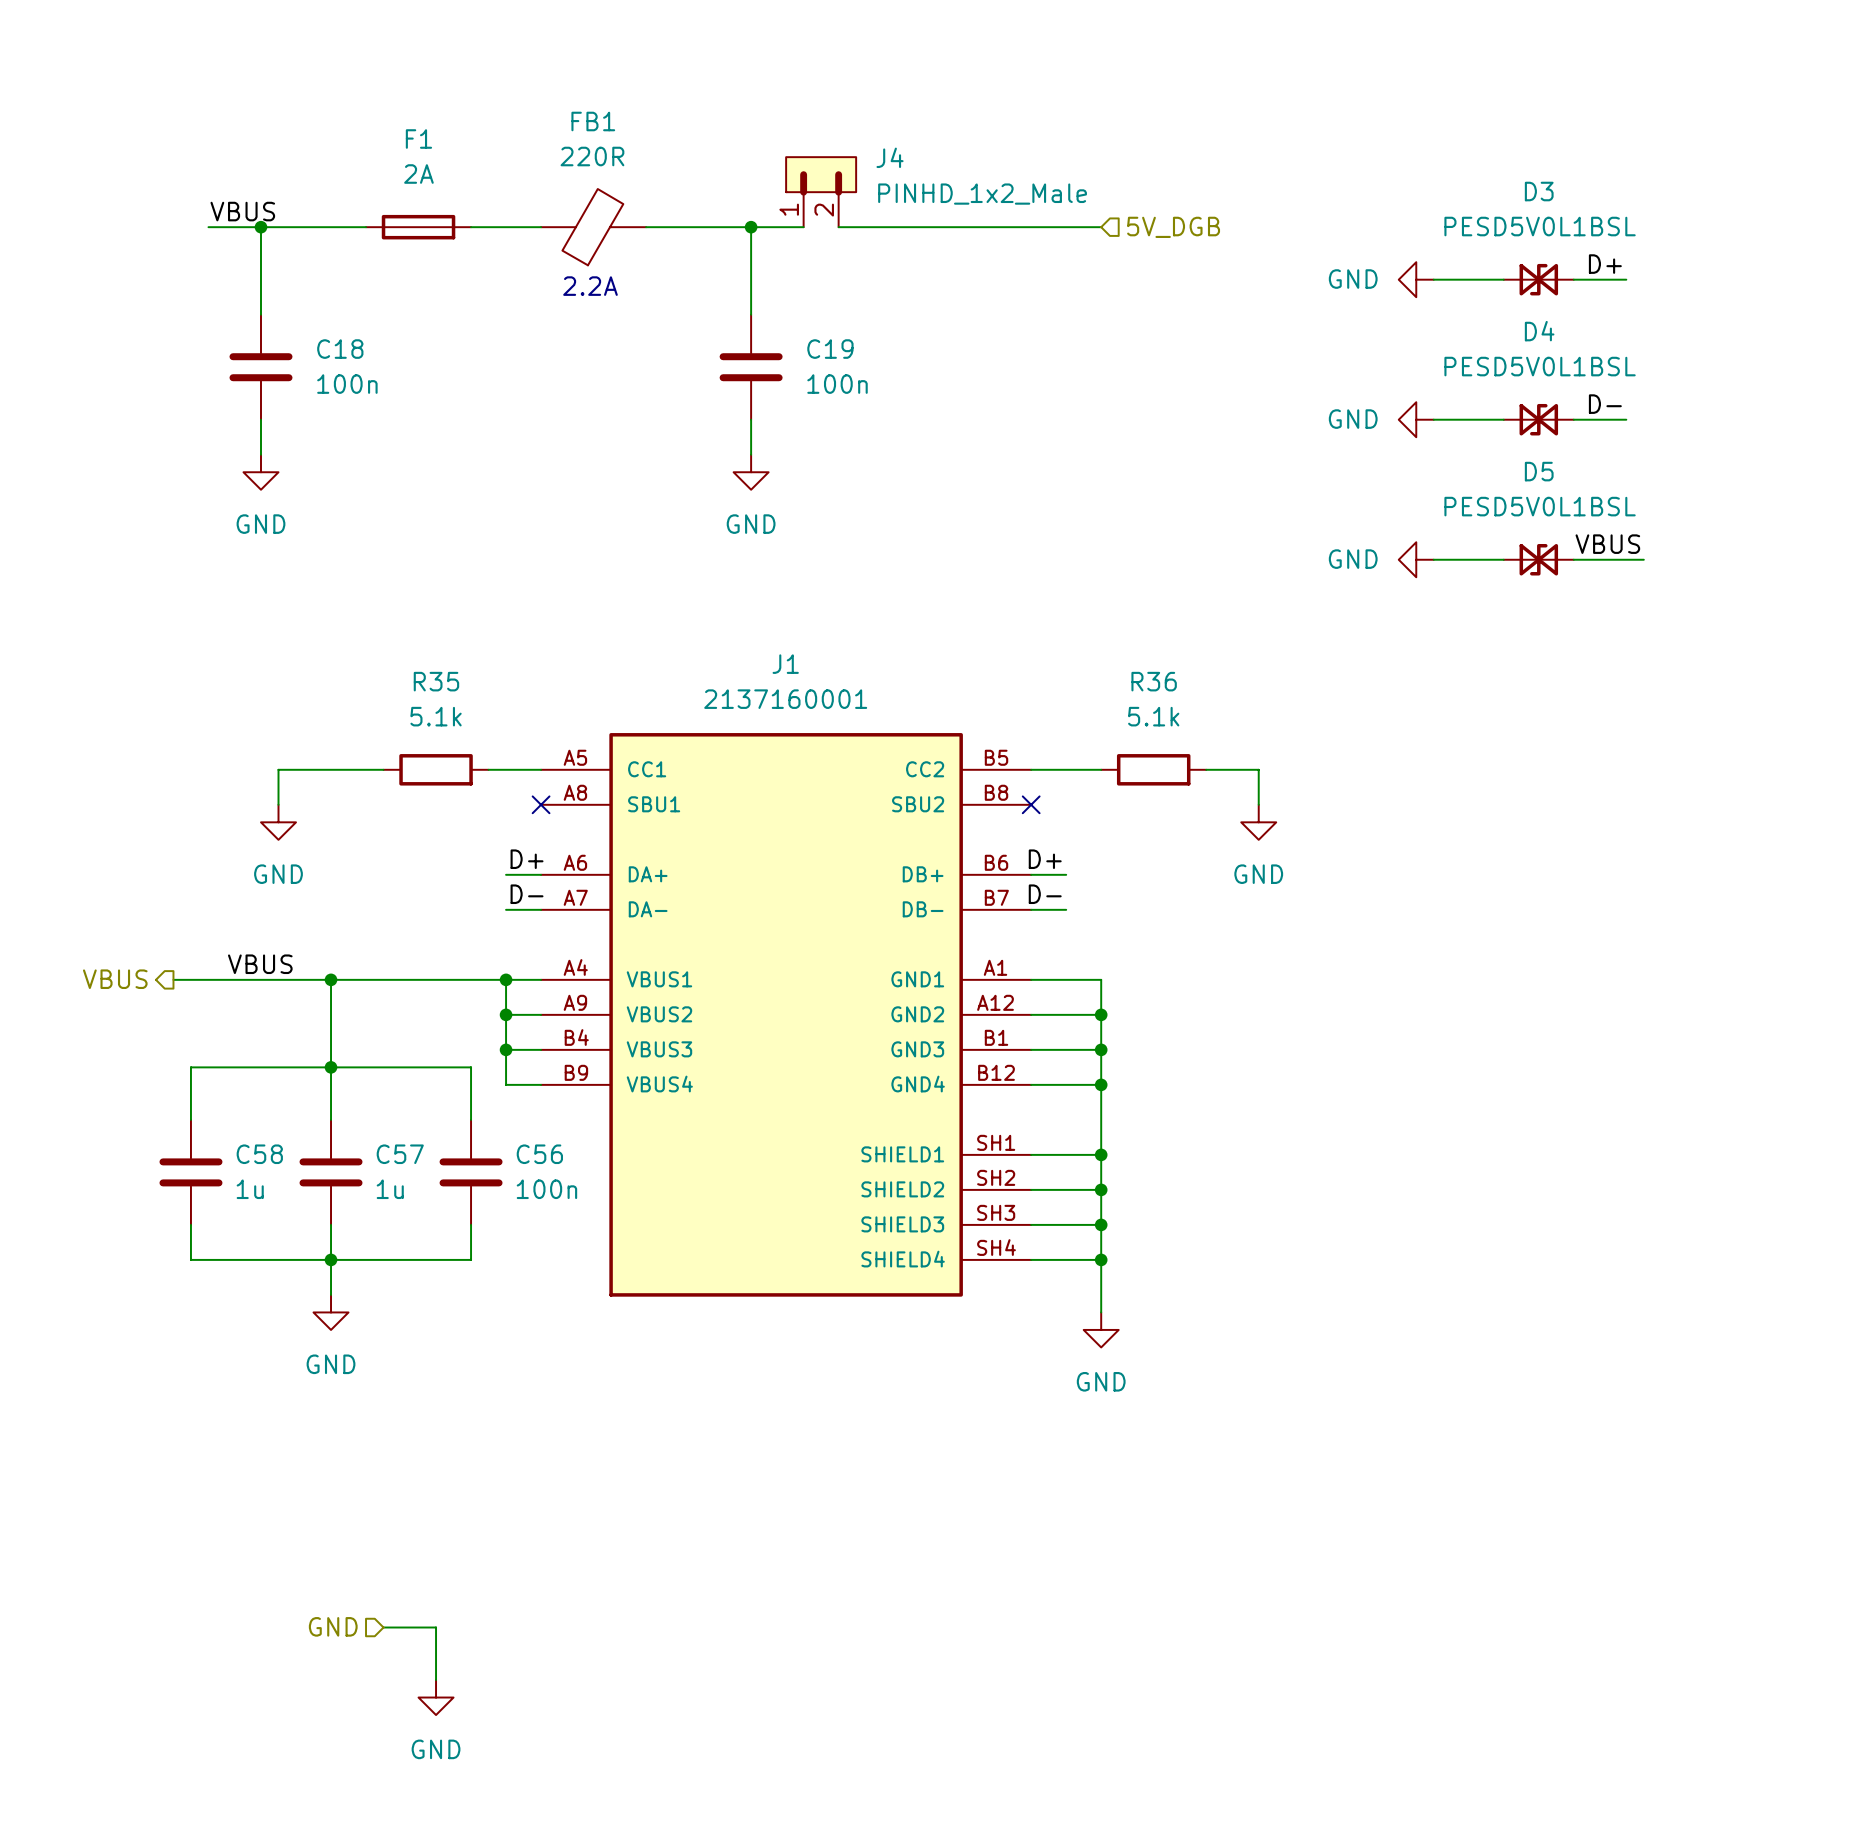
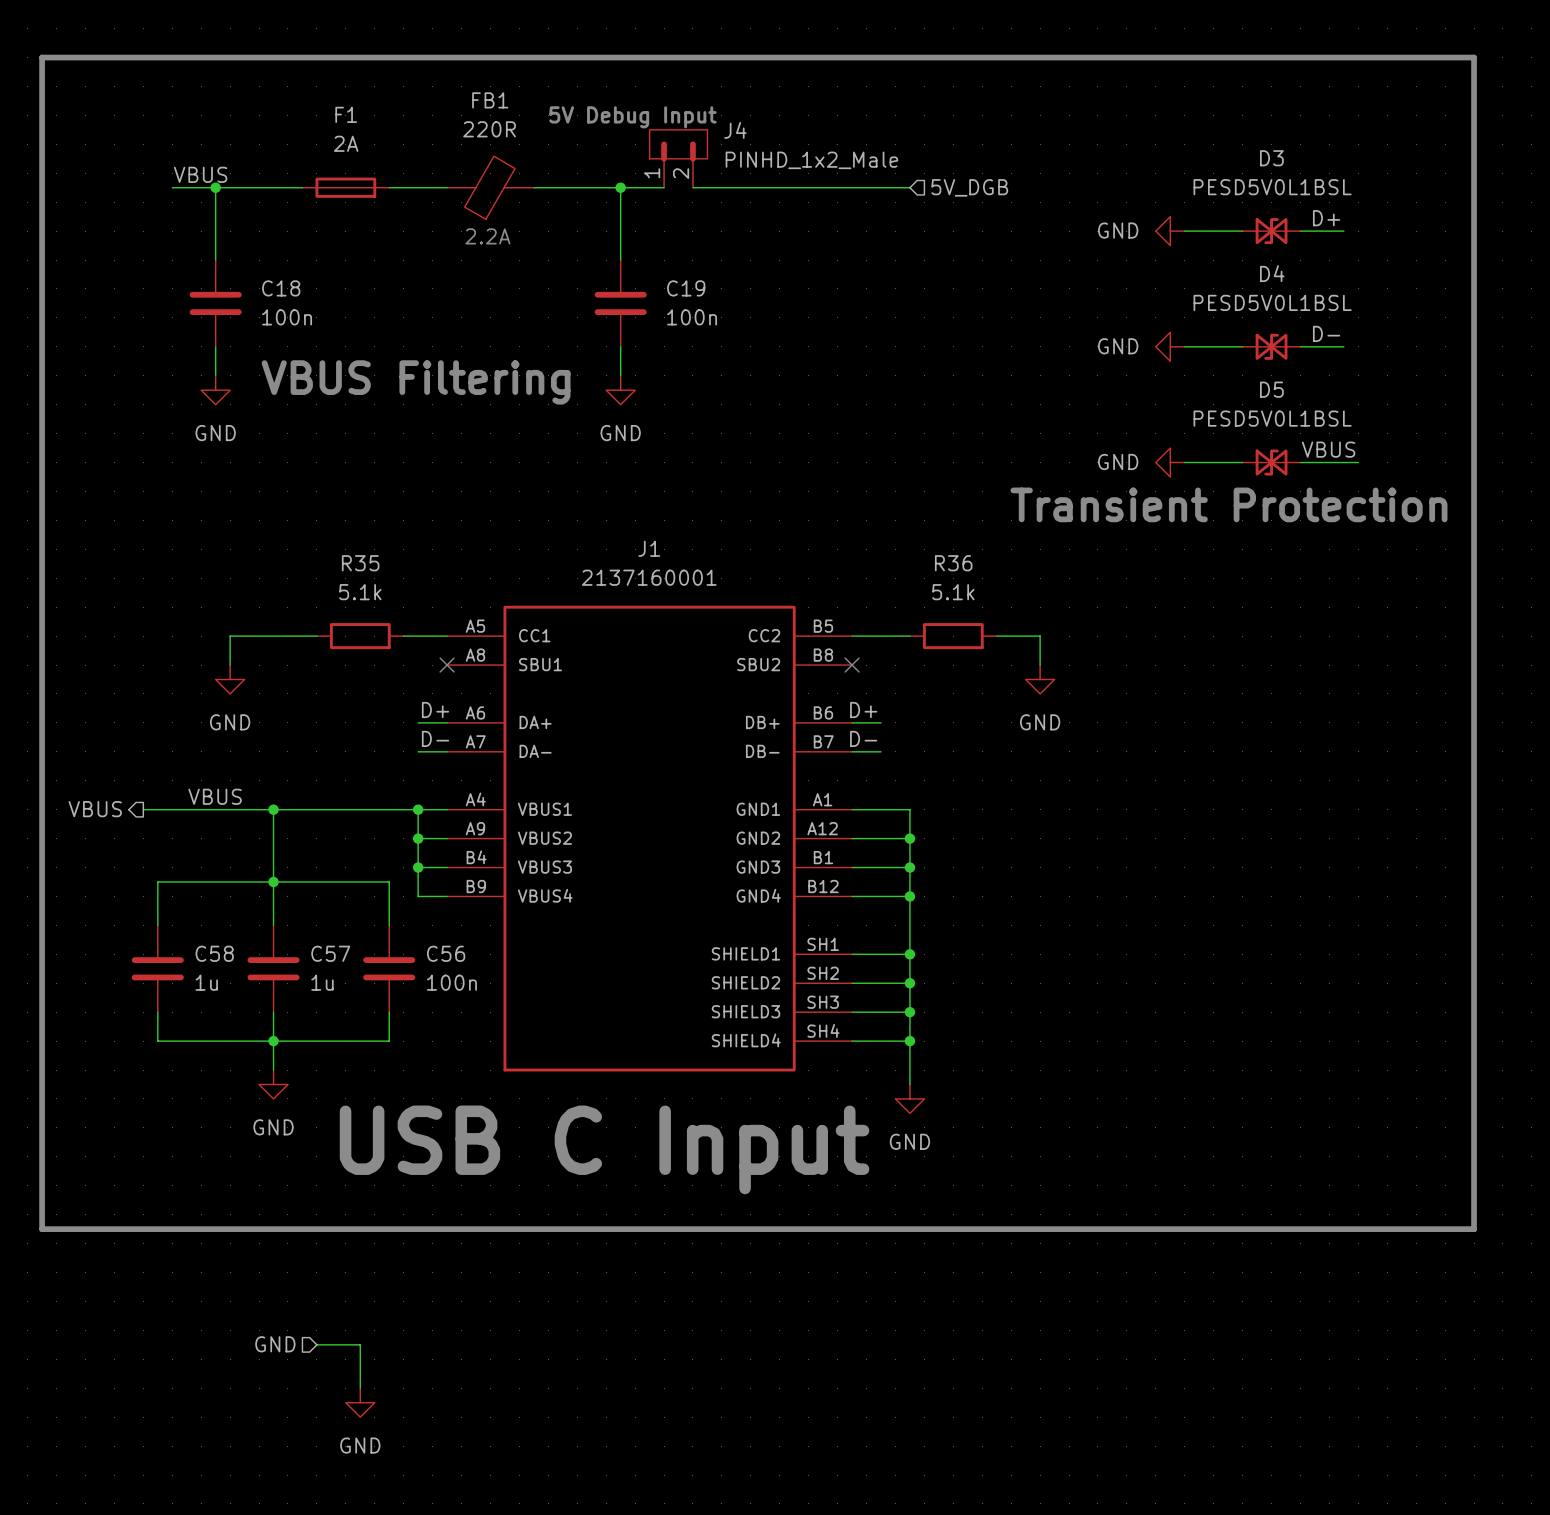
line: none -> (42, 57) (1474, 57) (1474, 1229) (42, 1229) (42, 57)
text: none -> 5V Debug Input (632, 117)
text: none -> VBUS Filtering (416, 382)
text: none -> Transient Protection (1228, 504)
text: none -> USB C Input (604, 1149)

